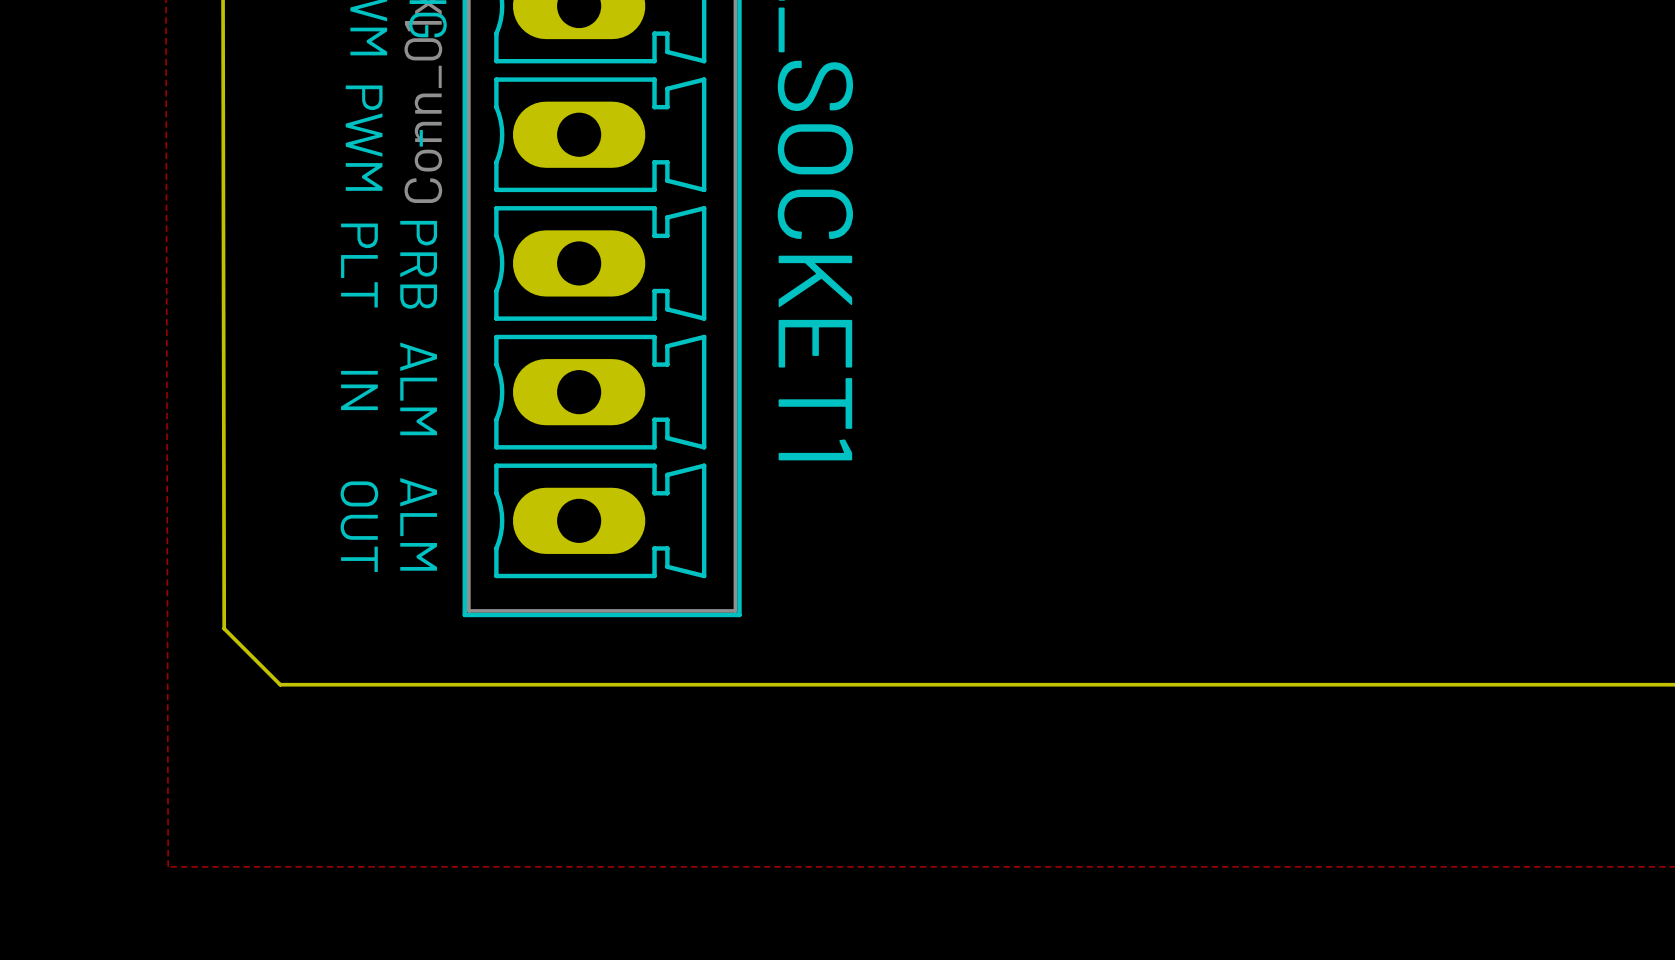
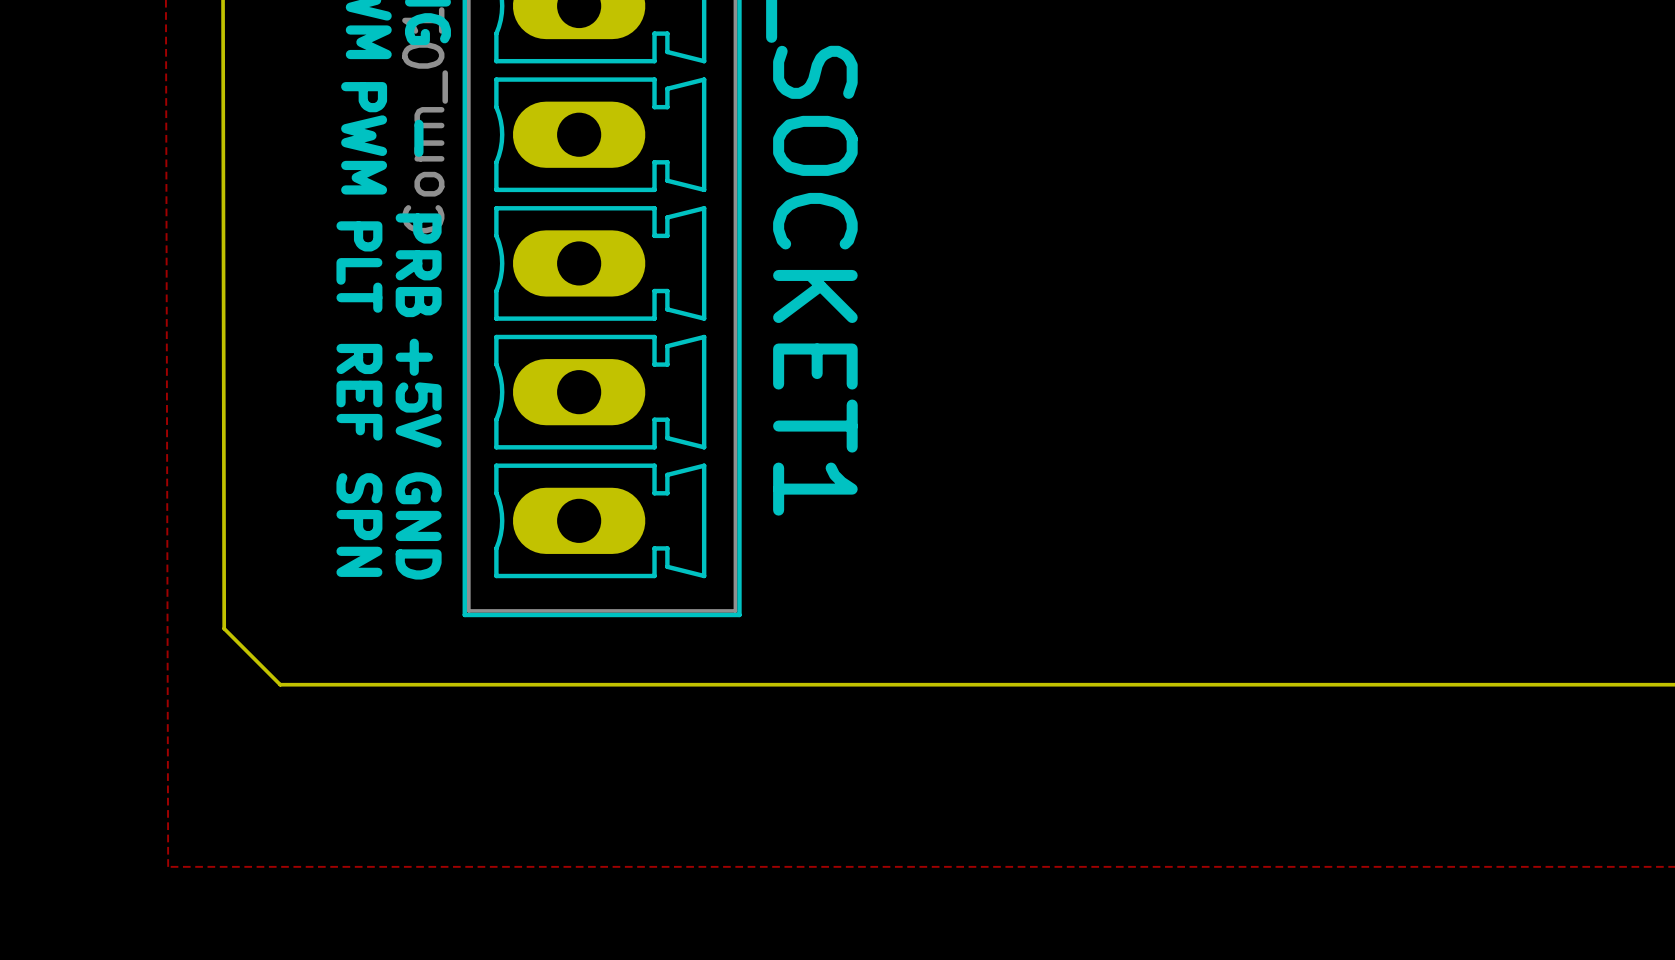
text: ALM (418, 388) -> +5V (418, 393)
text: IN (359, 390) -> REF (359, 392)
text: ALM (418, 524) -> GND (418, 525)
text: OUT (359, 526) -> SPN (359, 525)

